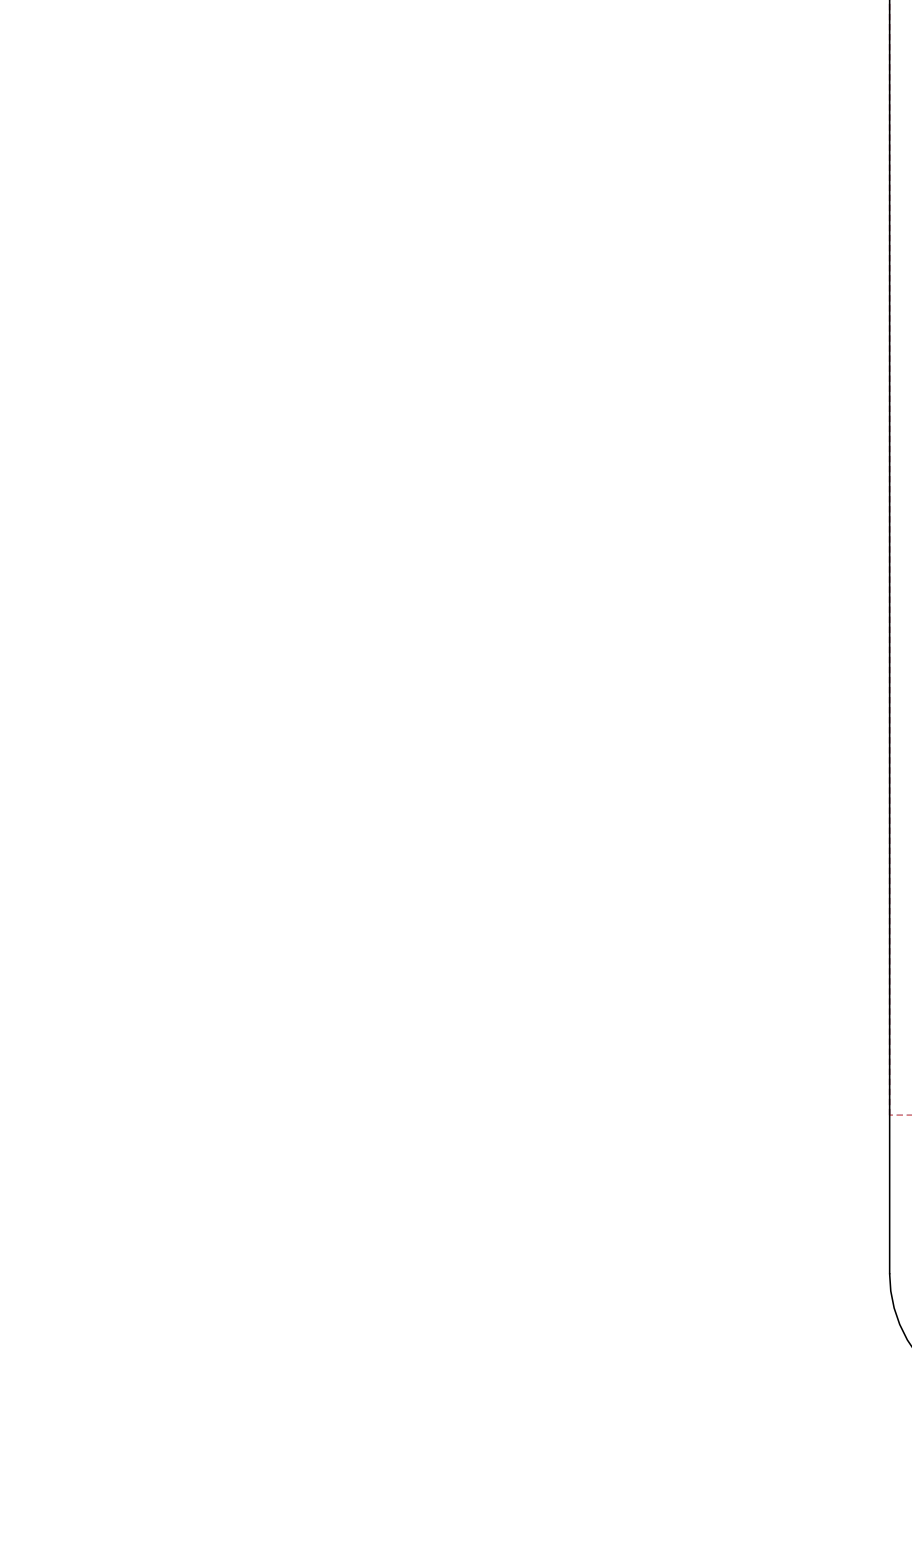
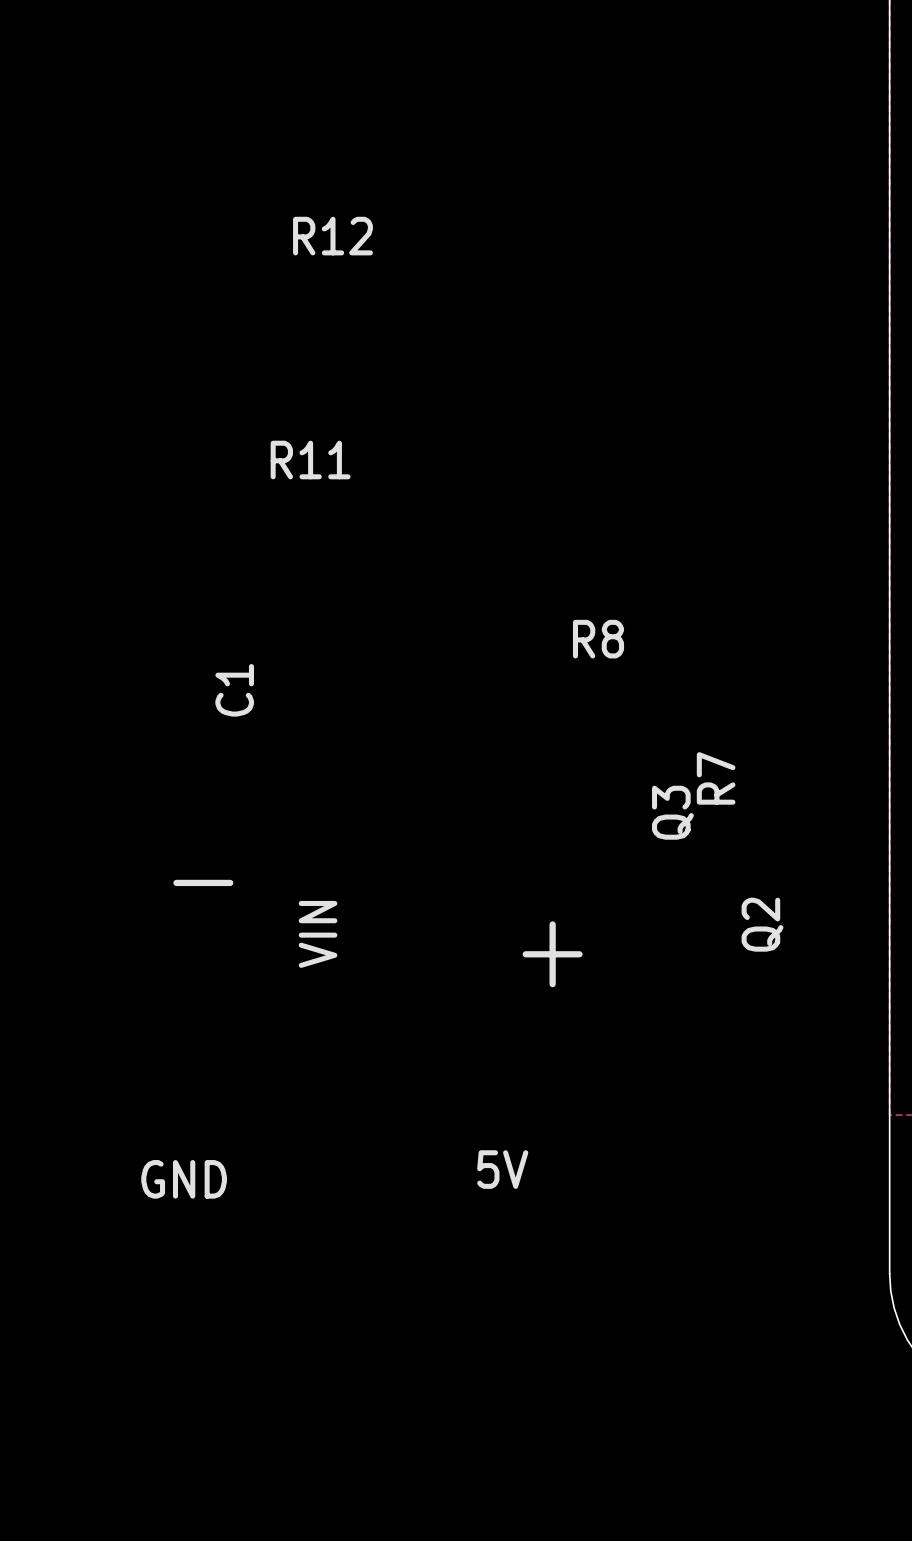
text: none -> R12 (333, 236)
text: none -> R11 (310, 460)
text: none -> R8 (598, 639)
text: none -> C1 (234, 690)
text: none -> R7 (716, 778)
text: none -> Q3 (672, 812)
text: none -> - (203, 882)
text: none -> Q2 (762, 924)
text: none -> VIN (318, 934)
text: none -> + (552, 954)
text: none -> 5V (502, 1169)
text: none -> GND (184, 1179)

